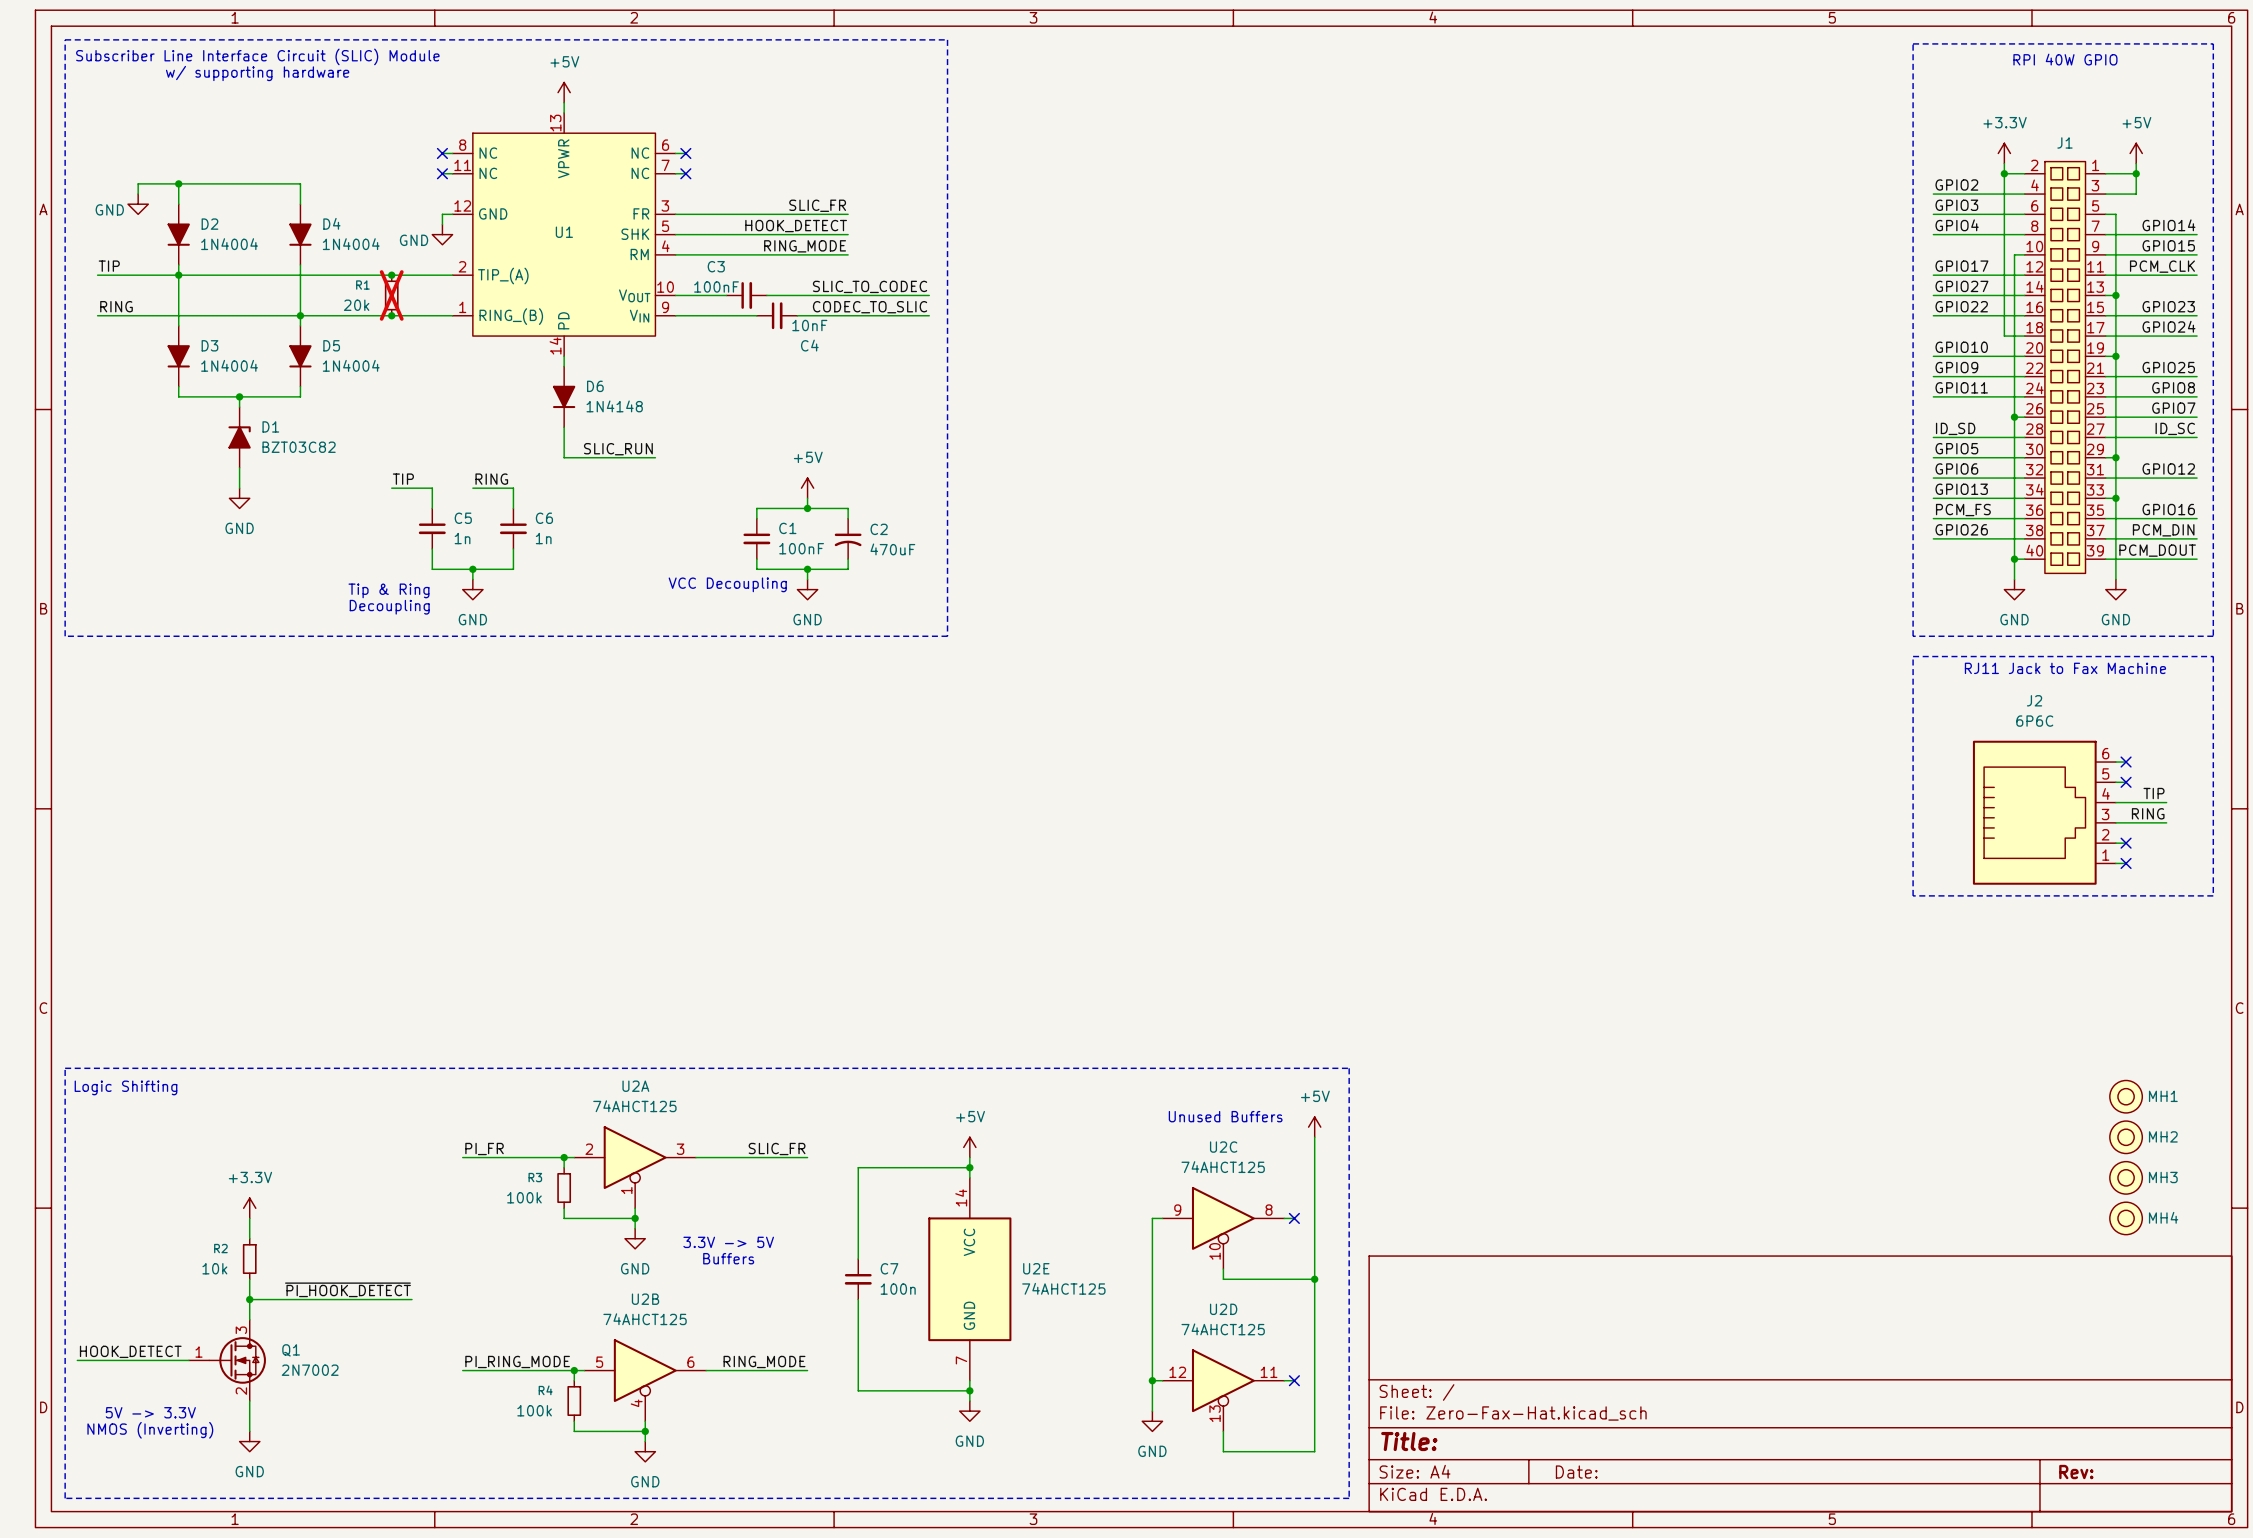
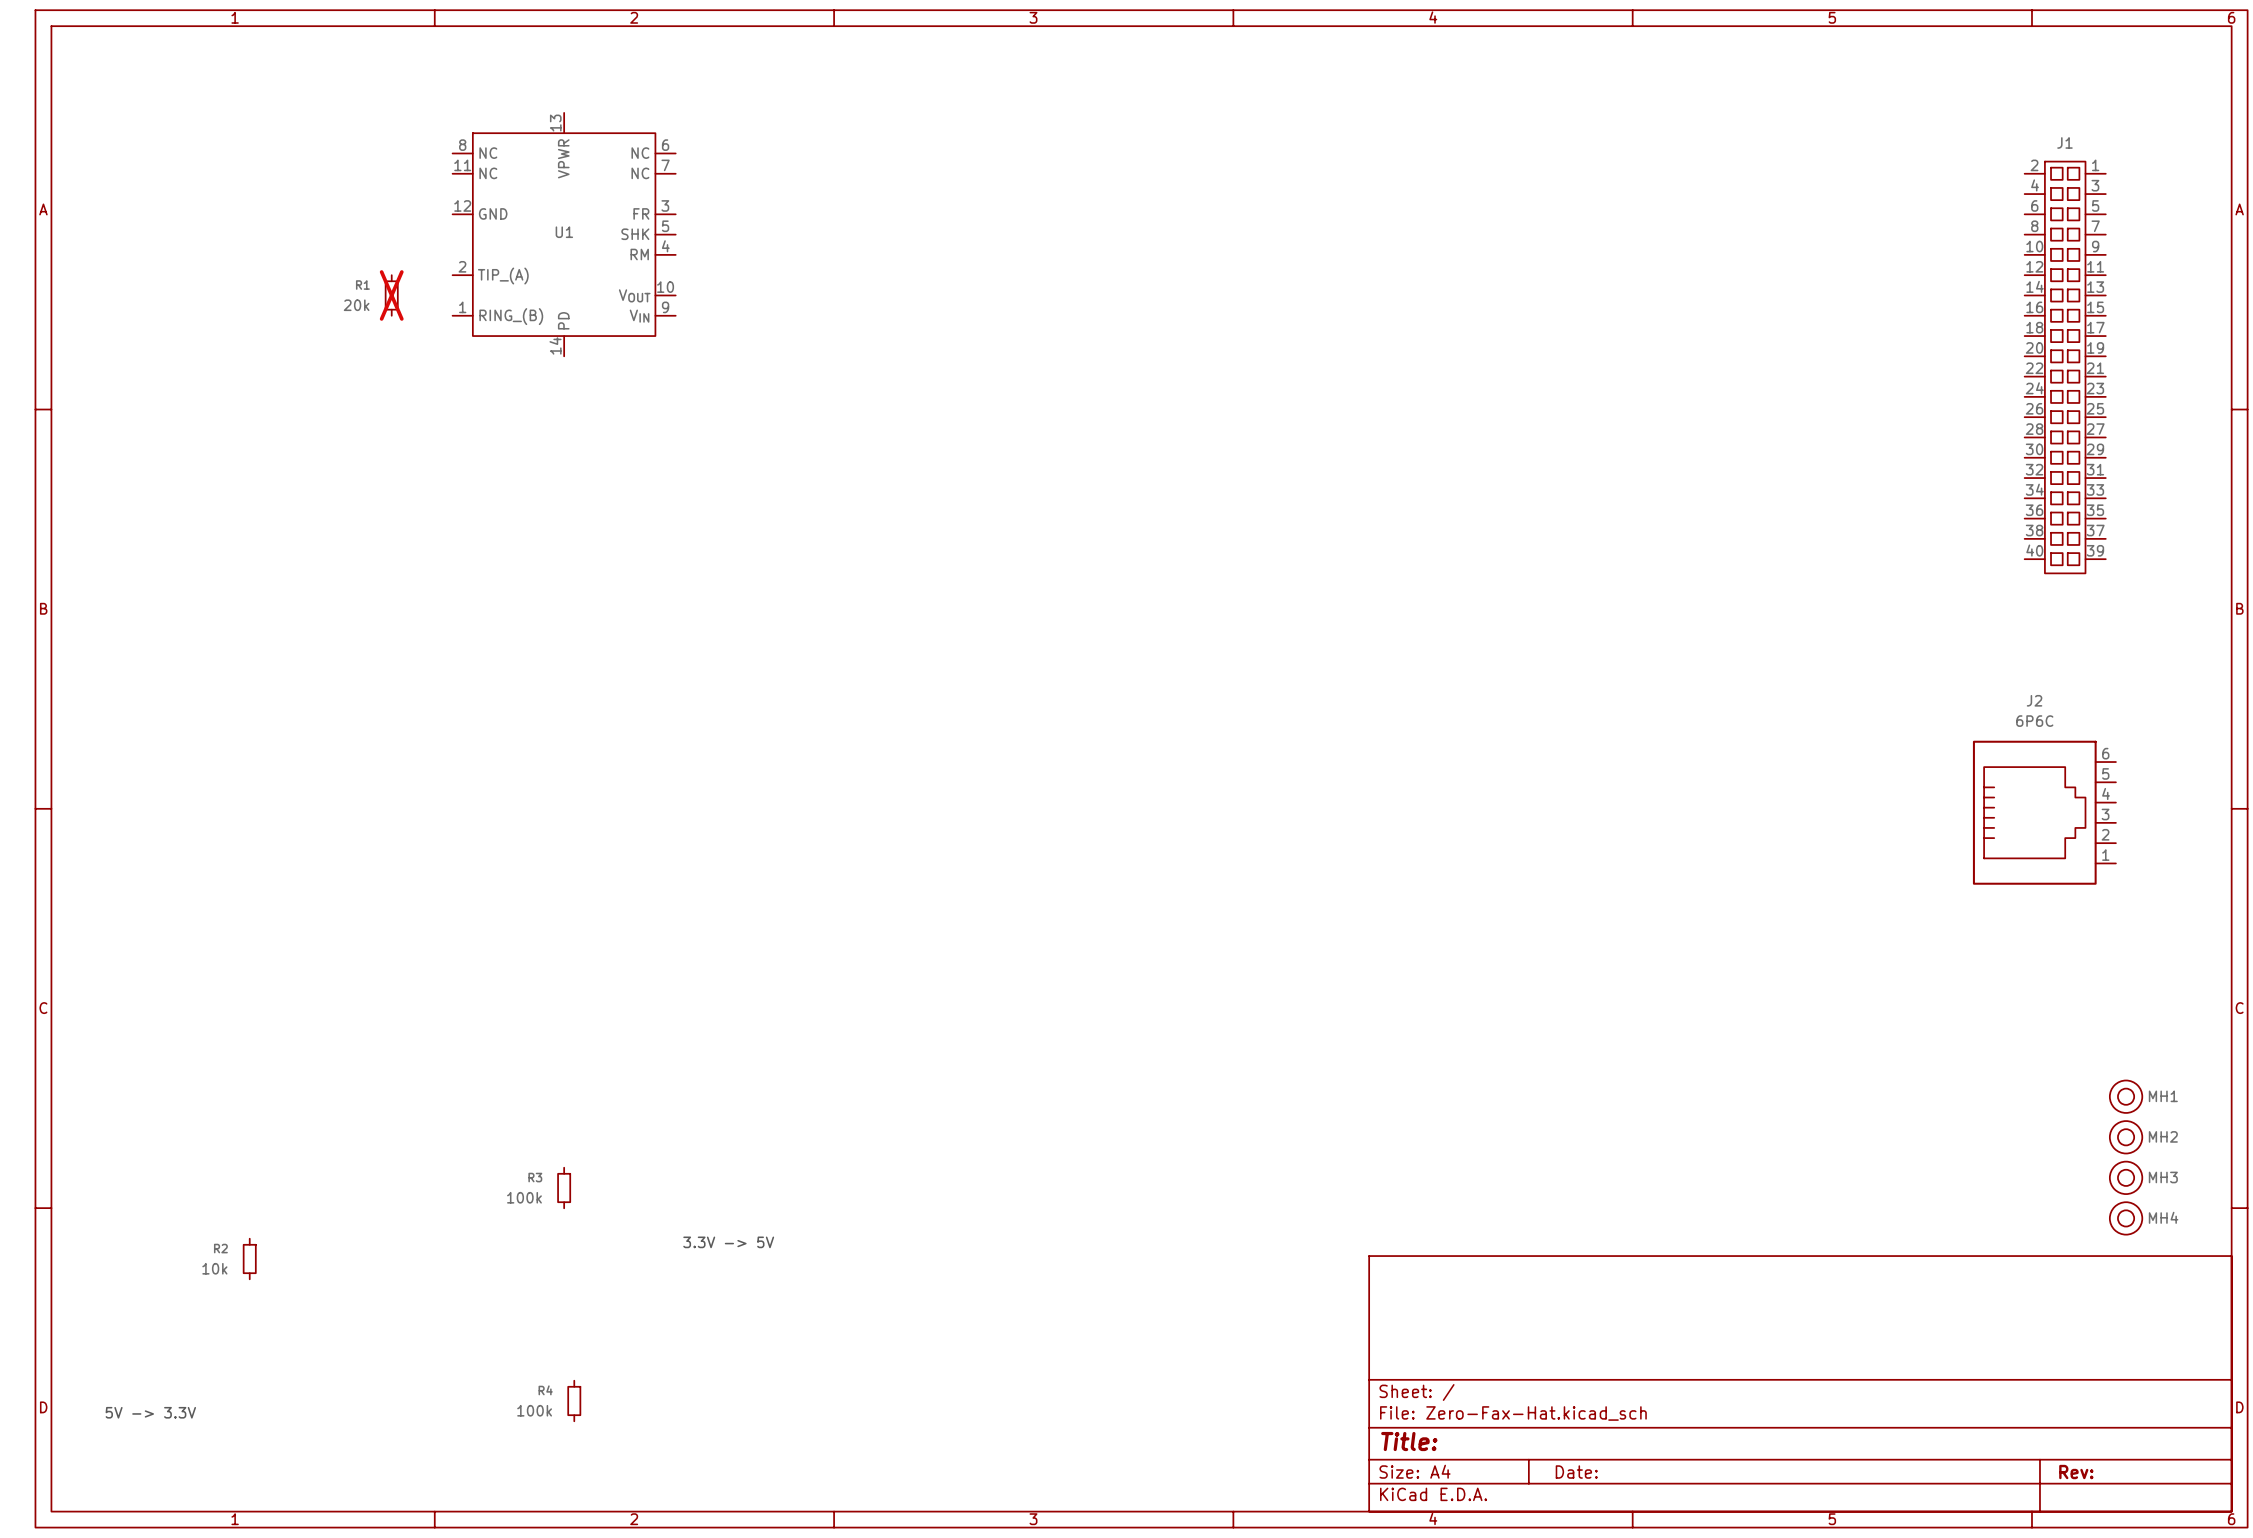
line: (65, 39) (65, 636) (947, 636) (947, 39) (65, 39) -> none
line: (1913, 43) (2213, 43) (2213, 636) (1913, 636) (1913, 43) -> none
text: Subscriber Line Interface Circuit (SLIC) Module (257, 56) -> none
text: RPI 40W GPIO (2065, 59) -> none
text: w/ supporting hardware (257, 73) -> none
power symbol: +5V (564, 92) -> none
wire: (564, 102) (564, 112) -> none
wire: (442, 153) (452, 153) -> none
no-connect mark: (442, 153) -> none
wire: (675, 153) (685, 153) -> none
no-connect mark: (685, 153) -> none
power symbol: +3.3V (2004, 153) -> none
power symbol: +5V (2136, 153) -> none
wire: (2004, 163) (2004, 336) (2024, 336) -> none
wire: (2136, 163) (2136, 194) (2105, 194) -> none
wire: (442, 173) (452, 173) -> none
no-connect mark: (442, 173) -> none
wire: (675, 173) (685, 173) -> none
no-connect mark: (685, 173) -> none
wire: (2004, 173) (2024, 173) -> none
junction: (2004, 173) -> none
wire: (2105, 173) (2136, 173) -> none
junction: (2136, 173) -> none
wire: (178, 183) (178, 204) -> none
junction: (178, 183) -> none
label: GPIO2 (1956, 184) -> none
wire: (138, 194) (138, 183) (300, 183) (300, 204) -> none
wire: (1933, 194) (2024, 194) -> none
power symbol: GND (138, 204) -> none
label: SLIC_FR (817, 205) -> none
label: GPIO3 (1956, 205) -> none
wire: (452, 214) (442, 214) (442, 224) -> none
wire: (675, 214) (848, 214) -> none
wire: (1933, 214) (2024, 214) -> none
wire: (2105, 214) (2115, 214) (2115, 579) -> none
label: GPIO4 (1957, 225) -> none
label: GPIO14 (2168, 225) -> none
label: HOOK_DETECT (796, 226) -> none
D2: 1N4004 (178, 234) -> none
D4: 1N4004 (300, 234) -> none
power symbol: GND (442, 234) -> none
wire: (675, 234) (848, 234) -> none
wire: (1933, 234) (2024, 234) -> none
wire: (2105, 234) (2197, 234) -> none
label: GPIO15 (2168, 245) -> none
label: RING_MODE (805, 246) -> none
wire: (675, 254) (848, 254) -> none
wire: (2024, 254) (2014, 254) (2014, 579) -> none
wire: (2105, 254) (2197, 254) -> none
wire: (178, 265) (178, 325) -> none
wire: (300, 265) (300, 325) -> none
label: TIP (109, 266) -> none
label: GPIO17 (1961, 266) -> none
label: PCM_CLK (2162, 266) -> none
wire: (97, 275) (452, 275) -> none
junction: (178, 275) -> none
junction: (391, 275) -> none
wire: (1933, 275) (2024, 275) -> none
wire: (2105, 275) (2197, 275) -> none
label: SLIC_TO_CODEC (870, 286) -> none
label: GPIO27 (1961, 286) -> none
wire: (675, 295) (726, 295) -> none
C3: 100nF (746, 295) -> none
wire: (766, 295) (929, 295) -> none
wire: (1933, 295) (2024, 295) -> none
wire: (2105, 295) (2115, 295) -> none
junction: (2115, 295) -> none
label: RING (116, 306) -> none
label: GPIO22 (1961, 306) -> none
label: GPIO23 (2168, 306) -> none
label: CODEC_TO_SLIC (870, 307) -> none
wire: (97, 315) (452, 315) -> none
junction: (300, 315) -> none
junction: (391, 315) -> none
wire: (675, 315) (756, 315) -> none
C4: 10nF (777, 315) -> none
wire: (797, 315) (929, 315) -> none
wire: (1933, 315) (2024, 315) -> none
wire: (2105, 315) (2197, 315) -> none
label: GPIO24 (2168, 326) -> none
wire: (2105, 336) (2197, 336) -> none
label: GPIO10 (1961, 347) -> none
D3: 1N4004 (178, 356) -> none
D5: 1N4004 (300, 356) -> none
wire: (564, 356) (564, 366) -> none
wire: (1933, 356) (2024, 356) -> none
wire: (2105, 356) (2115, 356) -> none
junction: (2115, 356) -> none
label: GPIO9 (1956, 367) -> none
label: GPIO25 (2168, 367) -> none
wire: (1933, 376) (2024, 376) -> none
wire: (2105, 376) (2197, 376) -> none
wire: (178, 386) (178, 396) (300, 396) (300, 386) -> none
label: GPIO11 (1961, 387) -> none
label: GPIO8 (2173, 387) -> none
wire: (239, 396) (239, 407) -> none
junction: (239, 396) -> none
D6: 1N4148 (564, 396) -> none
wire: (1933, 396) (2024, 396) -> none
wire: (2105, 396) (2197, 396) -> none
label: GPIO7 (2173, 408) -> none
wire: (2014, 417) (2024, 417) -> none
junction: (2014, 417) -> none
wire: (2105, 417) (2197, 417) -> none
wire: (564, 427) (564, 457) (655, 457) -> none
label: ID_SD (1955, 428) -> none
label: ID_SC (2175, 428) -> none
D1: BZT03C82 (239, 437) -> none
wire: (1933, 437) (2024, 437) -> none
wire: (2105, 437) (2197, 437) -> none
label: GPIO5 (1956, 448) -> none
label: SLIC_RUN (618, 449) -> none
wire: (1933, 457) (2024, 457) -> none
wire: (2105, 457) (2115, 457) -> none
junction: (2115, 457) -> none
wire: (239, 467) (239, 488) -> none
label: GPIO6 (1956, 468) -> none
label: GPIO12 (2168, 468) -> none
wire: (1933, 478) (2024, 478) -> none
wire: (2105, 478) (2197, 478) -> none
label: TIP (403, 479) -> none
label: RING (491, 479) -> none
wire: (391, 488) (432, 488) (432, 508) -> none
wire: (472, 488) (513, 488) (513, 508) -> none
power symbol: +5V (807, 488) -> none
label: GPIO13 (1961, 489) -> none
power symbol: GND (239, 498) -> none
wire: (807, 498) (807, 508) -> none
wire: (1933, 498) (2024, 498) -> none
wire: (2105, 498) (2115, 498) -> none
junction: (2115, 498) -> none
junction: (807, 508) -> none
label: GPIO16 (2168, 509) -> none
label: PCM_FS (1963, 510) -> none
wire: (756, 518) (756, 508) (848, 508) (848, 518) -> none
wire: (1933, 518) (2024, 518) -> none
wire: (2105, 518) (2197, 518) -> none
C5: 1n (432, 528) -> none
C6: 1n (513, 528) -> none
label: GPIO26 (1961, 529) -> none
label: PCM_DIN (2163, 530) -> none
C1: 100nF (756, 538) -> none
C2: 470uF (848, 538) -> none
wire: (1933, 538) (2024, 538) -> none
wire: (2105, 538) (2197, 538) -> none
wire: (432, 549) (432, 569) (513, 569) (513, 549) -> none
label: PCM_DOUT (2157, 550) -> none
wire: (756, 559) (756, 569) (848, 569) (848, 559) -> none
wire: (2014, 559) (2024, 559) -> none
junction: (2014, 559) -> none
wire: (2105, 559) (2197, 559) -> none
wire: (472, 569) (472, 579) -> none
junction: (472, 569) -> none
wire: (807, 569) (807, 579) -> none
junction: (807, 569) -> none
text: VCC Decoupling (727, 584) -> none
power symbol: GND (472, 589) -> none
power symbol: GND (807, 589) -> none
power symbol: GND (2014, 589) -> none
power symbol: GND (2115, 589) -> none
text: Tip & Ring (388, 590) -> none
text: Decoupling (389, 607) -> none
line: (1913, 656) (1913, 895) (2213, 895) (2213, 656) (1913, 656) -> none
text: RJ11 Jack to Fax Machine (2065, 668) -> none
wire: (2115, 762) (2126, 762) -> none
no-connect mark: (2126, 762) -> none
wire: (2115, 782) (2126, 782) -> none
no-connect mark: (2126, 782) -> none
label: TIP (2154, 793) -> none
wire: (2115, 802) (2166, 802) -> none
label: RING (2148, 813) -> none
wire: (2115, 822) (2166, 822) -> none
wire: (2115, 843) (2126, 843) -> none
no-connect mark: (2126, 843) -> none
wire: (2115, 863) (2126, 863) -> none
no-connect mark: (2126, 863) -> none
line: (65, 1068) (1349, 1068) (1349, 1498) (65, 1498) (65, 1068) -> none
text: Logic Shifting (125, 1087) -> none
text: Unused Buffers (1225, 1116) -> none
power symbol: +5V (1314, 1127) -> none
wire: (1314, 1137) (1314, 1451) (1223, 1451) (1223, 1431) -> none
power symbol: +5V (969, 1147) -> none
label: PI_FR (484, 1149) -> none
label: SLIC_FR (777, 1149) -> none
wire: (462, 1157) (574, 1157) -> none
wire: (564, 1157) (564, 1167) -> none
junction: (564, 1157) -> none
wire: (695, 1157) (807, 1157) -> none
wire: (969, 1157) (969, 1177) -> none
U2A: 74AHCT125 (635, 1167) -> none
wire: (969, 1167) (858, 1167) (858, 1259) -> none
junction: (969, 1167) -> none
power symbol: +3.3V (249, 1208) -> none
wire: (564, 1208) (564, 1218) (635, 1218) -> none
wire: (635, 1208) (635, 1228) -> none
wire: (249, 1218) (249, 1238) -> none
junction: (635, 1218) -> none
wire: (1162, 1218) (1152, 1218) (1152, 1411) -> none
wire: (1284, 1218) (1294, 1218) -> none
no-connect mark: (1294, 1218) -> none
U2C: 74AHCT125 (1223, 1228) -> none
power symbol: GND (635, 1238) -> none
text: Buffers (728, 1258) -> none
wire: (1223, 1269) (1223, 1279) (1314, 1279) -> none
wire: (249, 1279) (249, 1319) -> none
C7: 100n (858, 1279) -> none
U2E: 74AHCT125 (969, 1279) -> none
junction: (1314, 1279) -> none
label: ~{PI_HOOK_DETECT} (347, 1289) -> none
wire: (249, 1299) (412, 1299) -> none
junction: (249, 1299) -> none
wire: (858, 1299) (858, 1390) (969, 1390) -> none
label: HOOK_DETECT (130, 1351) -> none
wire: (77, 1360) (188, 1360) -> none
Q1: 2N7002 (227, 1360) -> none
label: PI_RING_MODE (517, 1361) -> none
label: RING_MODE (764, 1361) -> none
wire: (462, 1370) (584, 1370) -> none
wire: (574, 1370) (574, 1380) -> none
junction: (574, 1370) -> none
wire: (706, 1370) (807, 1370) -> none
U2B: 74AHCT125 (645, 1380) -> none
wire: (969, 1380) (969, 1400) -> none
wire: (1152, 1380) (1162, 1380) -> none
junction: (1152, 1380) -> none
wire: (1284, 1380) (1294, 1380) -> none
no-connect mark: (1294, 1380) -> none
junction: (969, 1390) -> none
U2D: 74AHCT125 (1223, 1390) -> none
wire: (249, 1400) (249, 1431) -> none
power symbol: GND (969, 1411) -> none
wire: (574, 1421) (574, 1431) (645, 1431) -> none
wire: (645, 1421) (645, 1441) -> none
power symbol: GND (1152, 1421) -> none
text: NMOS (Inverting) (150, 1430) -> none
junction: (645, 1431) -> none
power symbol: GND (249, 1441) -> none
power symbol: GND (645, 1451) -> none

